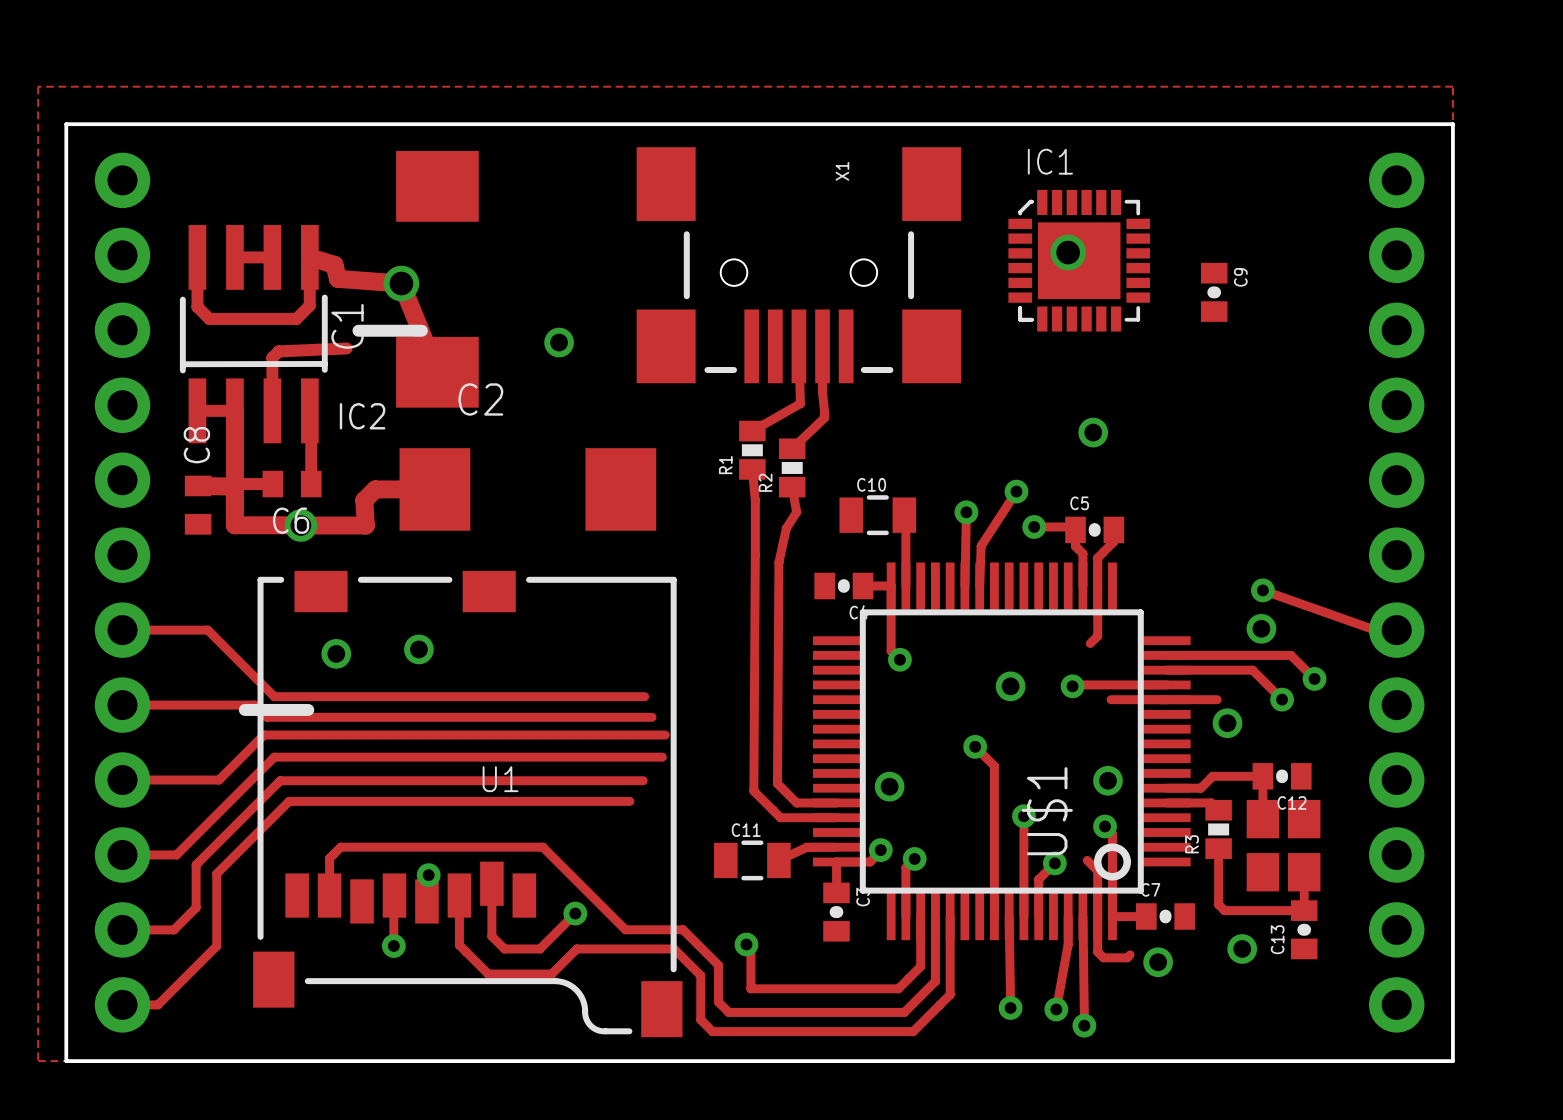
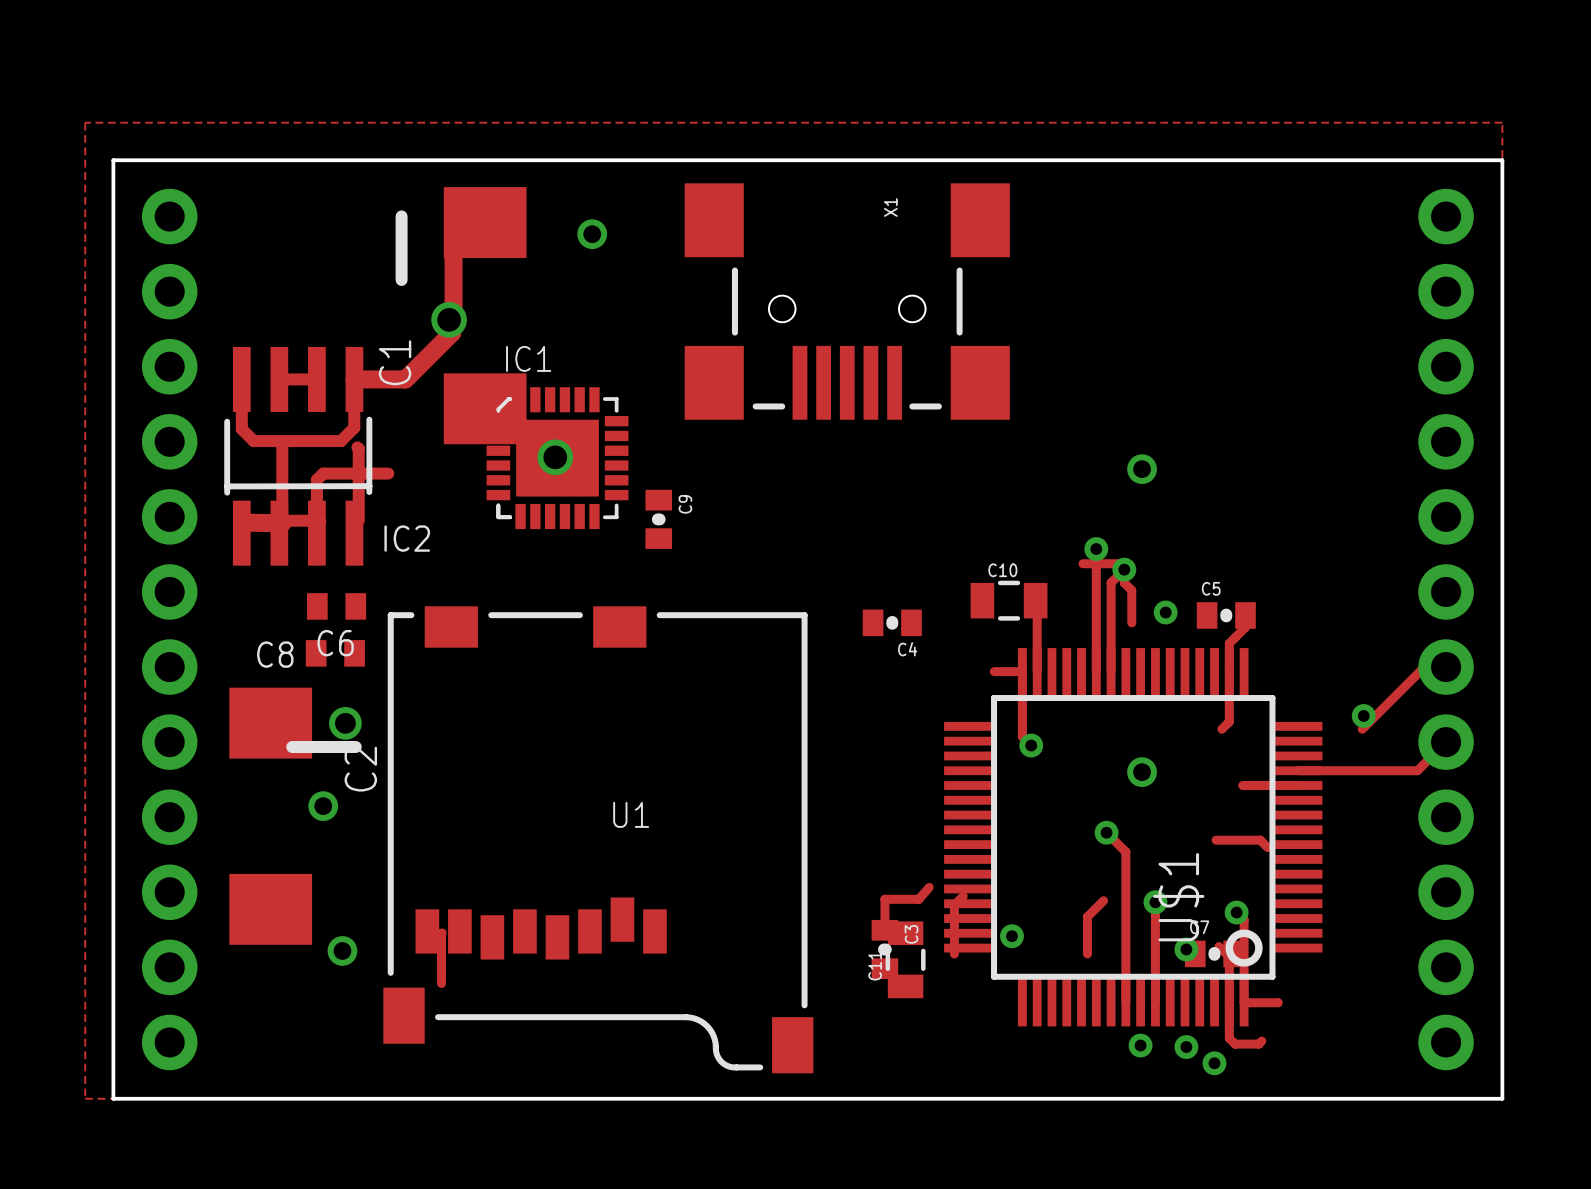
line: none -> (401, 216) (401, 279)
track: none -> (453, 249) (452, 332) (405, 379) (354, 379)
via: (1068, 252) -> none
track: (197, 257) (197, 306) (209, 318) (296, 318) (309, 305) (309, 257) -> (241, 379) (241, 429) (253, 441) (340, 441) (354, 427) (354, 379)
track: (234, 257) (272, 257) -> (279, 379) (316, 379)
track: (309, 257) (334, 264) (338, 278) (401, 283) (437, 372) -> none
IC1 position: (1079, 260) -> (557, 458)
C9 position: (1214, 292) -> (658, 519)
line: (324, 297) (324, 369) -> (369, 419) (369, 492)
line: (182, 299) (182, 370) -> (227, 421) (227, 492)
line: (358, 330) (421, 330) -> none
IC2 position: (253, 334) -> (298, 456)
via position: (559, 342) -> (592, 234)
track: (798, 346) (800, 403) (752, 431) -> none
track: (822, 346) (824, 417) (792, 448) -> none
track: (346, 348) (278, 351) (272, 357) (272, 410) -> none
line: (324, 363) (182, 364) -> (369, 486) (227, 486)
track: (197, 408) (197, 410) (234, 410) (234, 525) (300, 525) -> none
via: none -> (555, 457)
track: none -> (388, 473) (323, 473) (316, 479) (316, 533)
C8 name position: C8 (196, 445) -> C8 (275, 654)
R1: (752, 450) -> none
R2: (792, 467) -> none
track: (752, 469) (755, 500) (753, 791) (780, 817) (836, 817) -> none
C6 position: (292, 484) -> (336, 606)
track: (792, 487) (796, 512) (786, 528) (778, 562) (777, 783) (796, 802) (836, 802) -> none
track: (434, 489) (375, 489) (364, 500) (365, 525) (300, 525) -> none
C2 rotation: 0° (527, 489) -> 90° clockwise (270, 816)
C2 position: (527, 489) -> (270, 816)
track: (1016, 491) (981, 546) (979, 586) -> none
via: (1016, 491) -> none
C8 rotation: 0° (198, 505) -> 90° clockwise (335, 653)
C8 position: (198, 505) -> (335, 653)
track: (966, 512) (964, 586) -> none
via: (966, 512) -> none
track: none -> (1096, 549) (1096, 671)
C10 position: (877, 515) -> (1009, 600)
track: (904, 515) (905, 516) (905, 586) -> (1035, 600) (1037, 602) (1037, 671)
via position: (300, 525) -> (345, 723)
via position: (1034, 526) -> (1096, 549)
C5 position: (1094, 529) -> (1226, 615)
track: (1113, 529) (1113, 541) (1097, 557) (1097, 636) (1090, 643) -> (1245, 615) (1245, 627) (1229, 643) (1229, 721) (1221, 729)
track: none -> (1124, 569) (1111, 582) (1111, 671)
via: none -> (1124, 569)
via: none -> (1165, 612)
track: (863, 586) (891, 586) (891, 650) (899, 659) -> (994, 671) (1022, 671) (1022, 736) (1031, 745)
track: (1262, 590) (1375, 630) -> (1362, 729) (1424, 667)
via: (1262, 590) -> none
via: (1261, 628) -> none
track: (122, 630) (207, 630) (274, 696) (644, 696) -> none
via: (418, 649) -> none
via: (336, 653) -> none
track: (1167, 655) (1291, 655) (1314, 678) -> none
via: (899, 659) -> none
track: (1167, 670) (1252, 670) (1282, 699) -> none
track: (1167, 684) (1072, 686) -> none
via: (1010, 686) -> none
via: (1072, 686) -> none
track: (1110, 699) (1217, 699) -> none
via: (1282, 699) -> none
track: (122, 705) (254, 705) (266, 717) (652, 717) -> none
track: none -> (1446, 742) (1417, 770) (1298, 770)
via: (1227, 723) -> none
track: (665, 735) (264, 735) (219, 780) (122, 780) -> none
via: none -> (1142, 772)
track: (975, 746) (994, 766) (994, 916) -> (1106, 832) (1125, 852) (1125, 1002)
via position: (975, 746) -> (1031, 745)
track: none -> (1242, 785) (1298, 785)
U$1 position: (1001, 751) -> (1133, 837)
track: (662, 757) (274, 757) (176, 854) (122, 854) -> none
via: none -> (323, 806)
C12: (1282, 776) -> none
track: (643, 780) (280, 780) (196, 864) (196, 907) (173, 929) (122, 929) -> none
via: (1107, 780) -> none
via: (889, 786) -> none
track: (1167, 788) (1200, 788) (1212, 776) (1262, 776) (1262, 819) -> none
via: none -> (1106, 832)
track: (629, 801) (289, 801) (216, 873) (216, 946) (157, 1004) (122, 1004) -> none
U1 position: (467, 804) -> (598, 839)
track: (1023, 816) (1023, 916) -> (1155, 902) (1155, 1002)
via: (1023, 816) -> none
track: (1105, 826) (1112, 833) (1112, 916) (1146, 916) -> (1236, 912) (1244, 920) (1244, 1002) (1277, 1002)
via: (1105, 826) -> none
R3: (1218, 829) -> none
part: (1283, 845) -> none
track: (836, 847) (807, 847) (778, 860) -> none
track: (1218, 848) (1218, 904) (1224, 910) (1304, 910) (1304, 872) -> none
via: (880, 850) -> none
via: (914, 858) -> none
C11 rotation: 0° (752, 860) -> 90° clockwise (905, 959)
C11 position: (752, 860) -> (905, 959)
track: (1087, 860) (1097, 870) (1097, 951) (1103, 957) (1127, 957) (1130, 954) -> (1218, 946) (1229, 956) (1229, 1038) (1235, 1044) (1258, 1044) (1261, 1041)
via: (1054, 863) -> none
via: none -> (1155, 902)
via: (428, 875) -> none
via: none -> (1236, 912)
track: (491, 883) (491, 936) (504, 948) (539, 948) (575, 913) -> none
track: (329, 895) (329, 858) (340, 847) (542, 847) (625, 929) (683, 929) (718, 965) (718, 1002) (728, 1012) (904, 1012) (935, 981) (935, 916) -> none
track: (459, 895) (459, 945) (488, 974) (551, 974) (576, 948) (674, 948) (700, 975) (700, 1019) (712, 1031) (913, 1031) (950, 994) (950, 916) -> none
via: none -> (1011, 936)
via: none -> (1186, 949)
via: none -> (342, 950)
via: (575, 913) -> none
track: (920, 916) (920, 966) (898, 988) (750, 988) (750, 948) (746, 944) -> none
track: (1009, 916) (1010, 1007) -> none
track: (1068, 916) (1068, 944) (1056, 1009) -> none
track: (1082, 916) (1084, 1025) -> none
C13: (1304, 929) -> none
via: (746, 944) -> none
via: (393, 946) -> none
via: (1242, 948) -> none
via: (1158, 962) -> none
via: (1010, 1007) -> none
via: (1056, 1009) -> none
via: none -> (1186, 1047)
via position: (1084, 1025) -> (1140, 1045)
via: none -> (1214, 1063)

